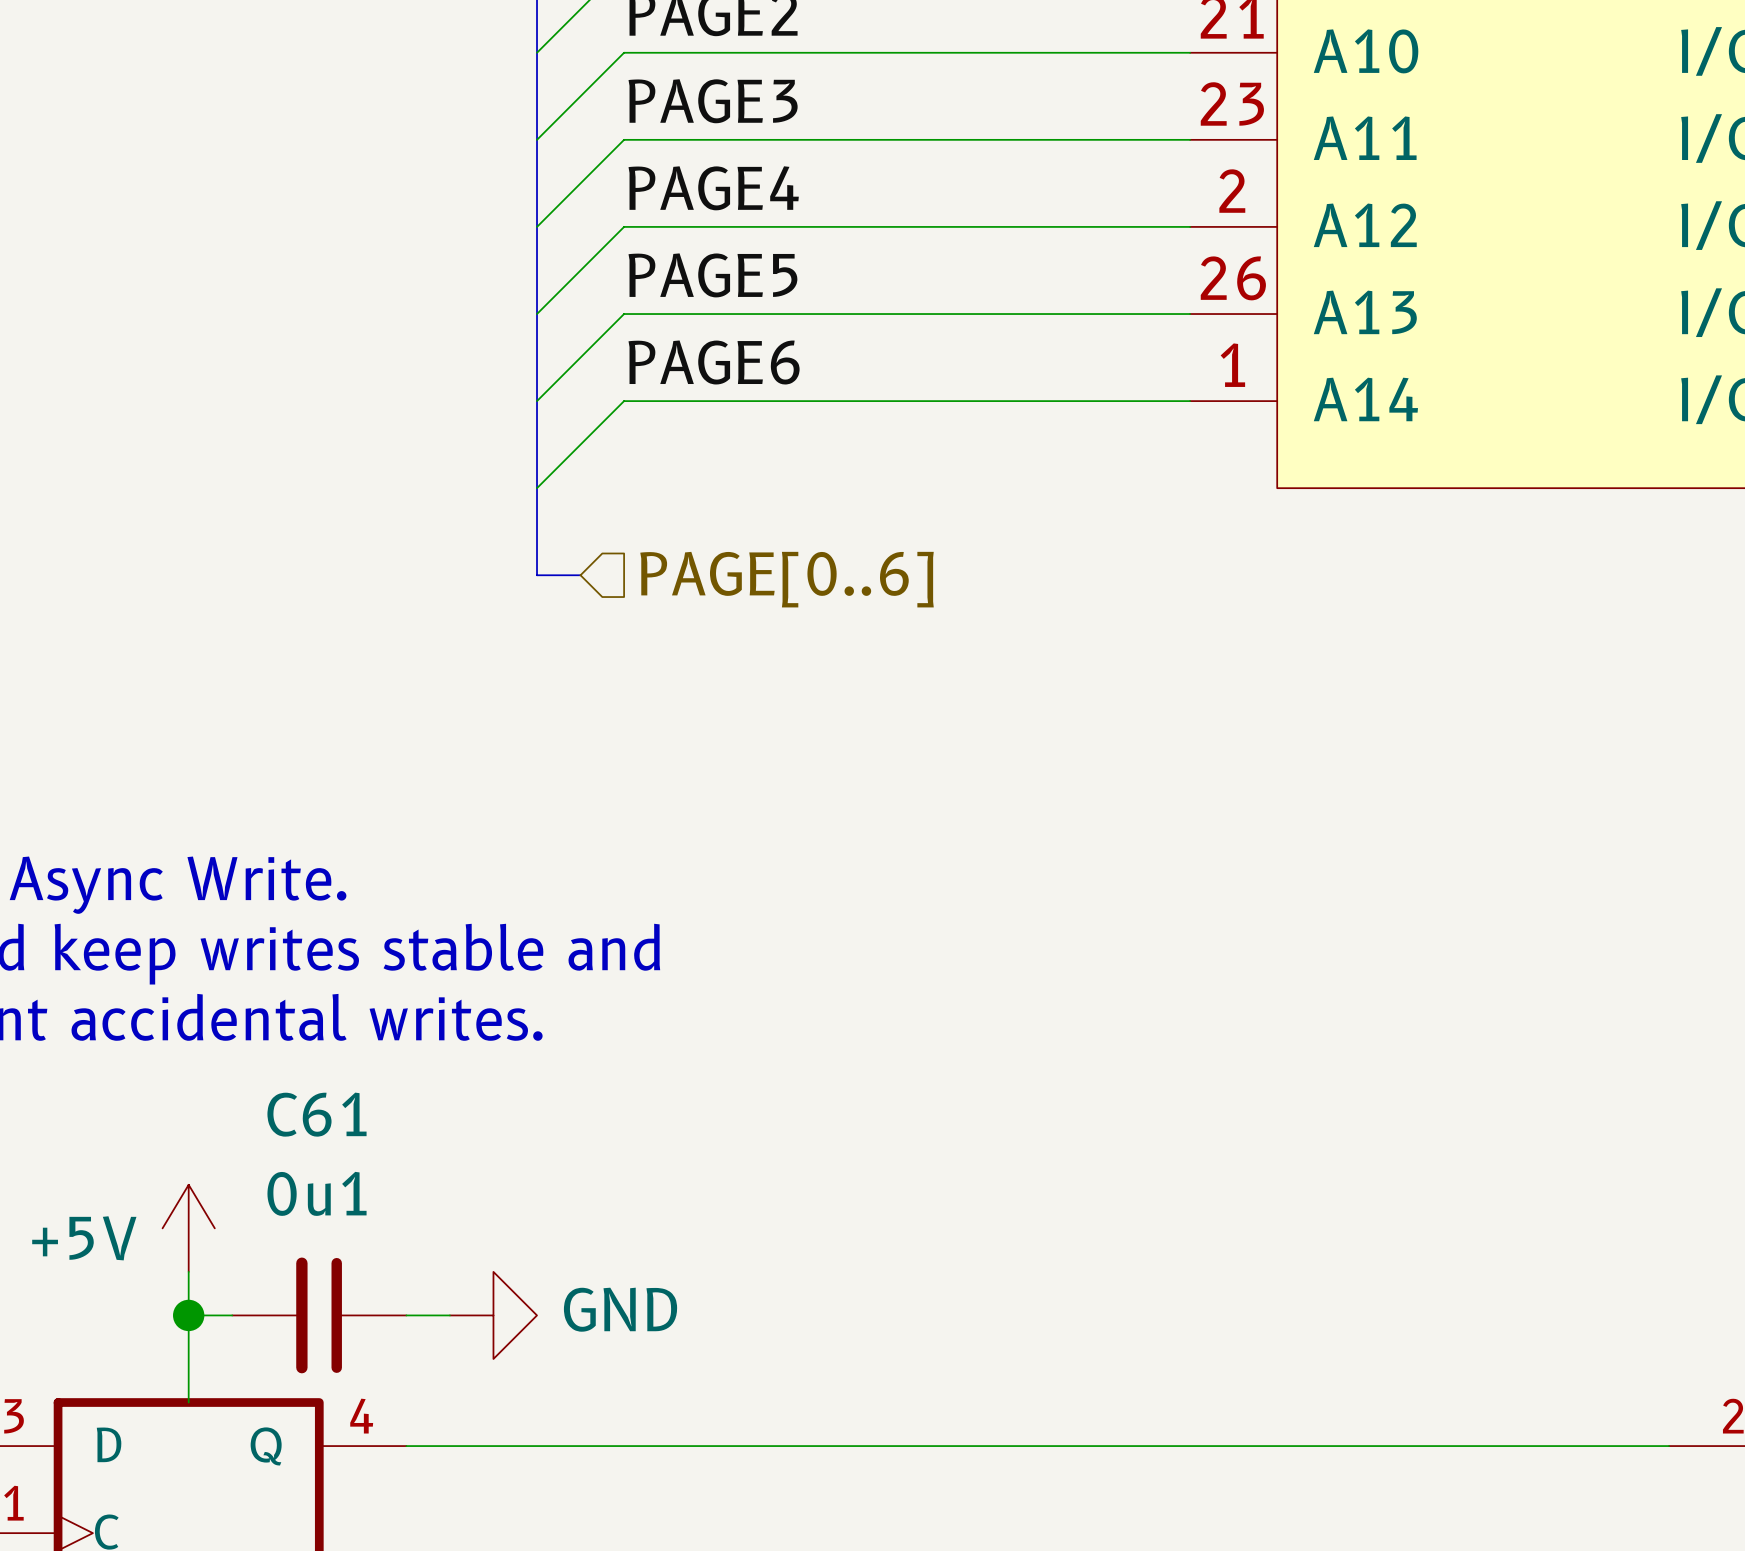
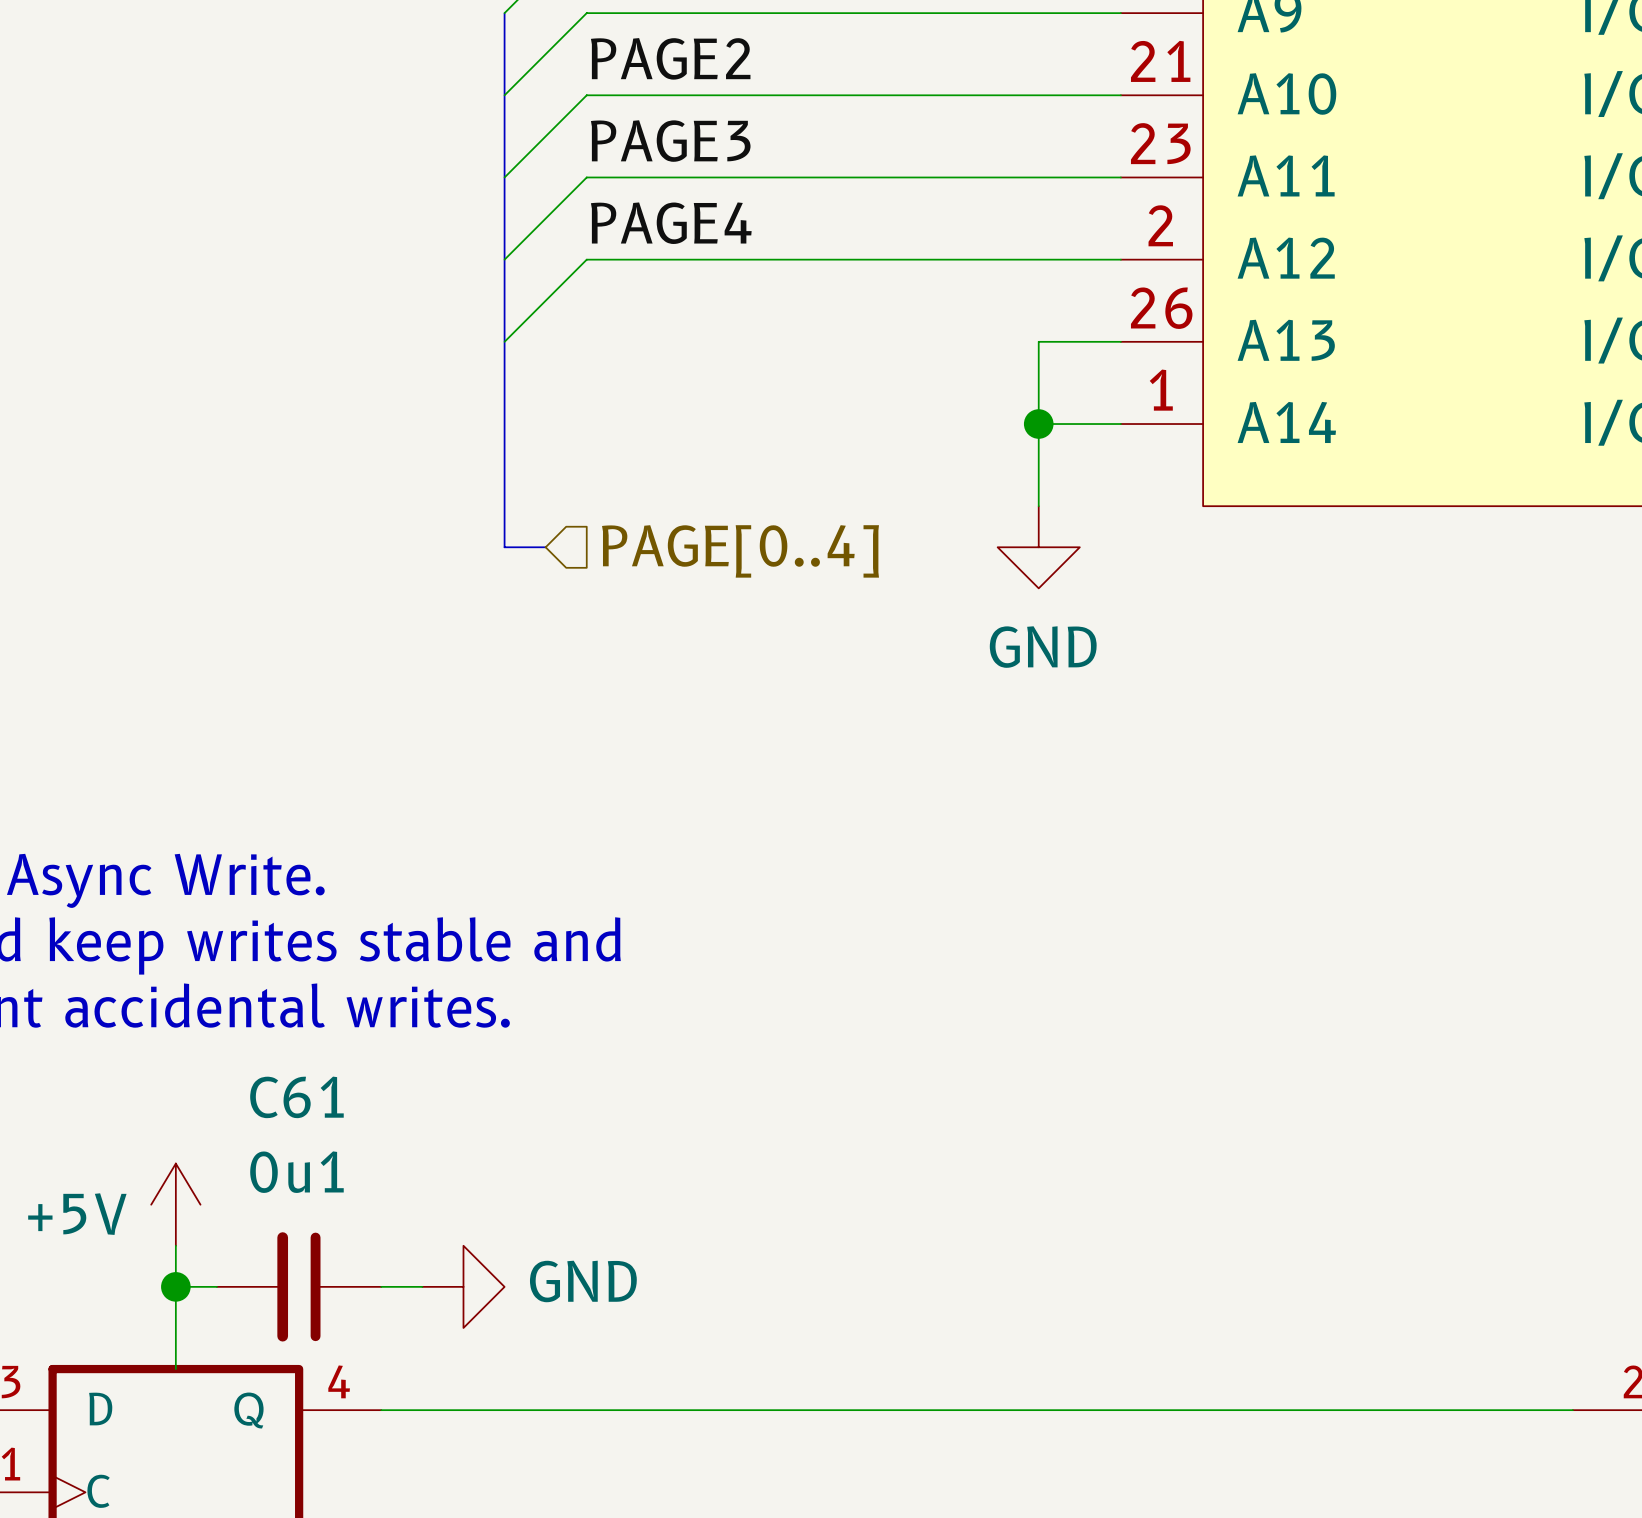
label: PAGE5 (712, 275) -> none
wire: (1103, 314) (624, 314) (537, 401) -> (1038, 341) (1038, 506)
label: PAGE6 (714, 362) -> none
wire: (1103, 401) (624, 401) (537, 488) -> none
junction: none -> (1038, 424)
bus: (537, 531) (537, 575) (580, 575) -> (504, 547) (545, 547)
power symbol: none -> GND (1038, 547)
hierarchical label: PAGE[0..6] (787, 579) -> PAGE[0..4] (740, 551)

